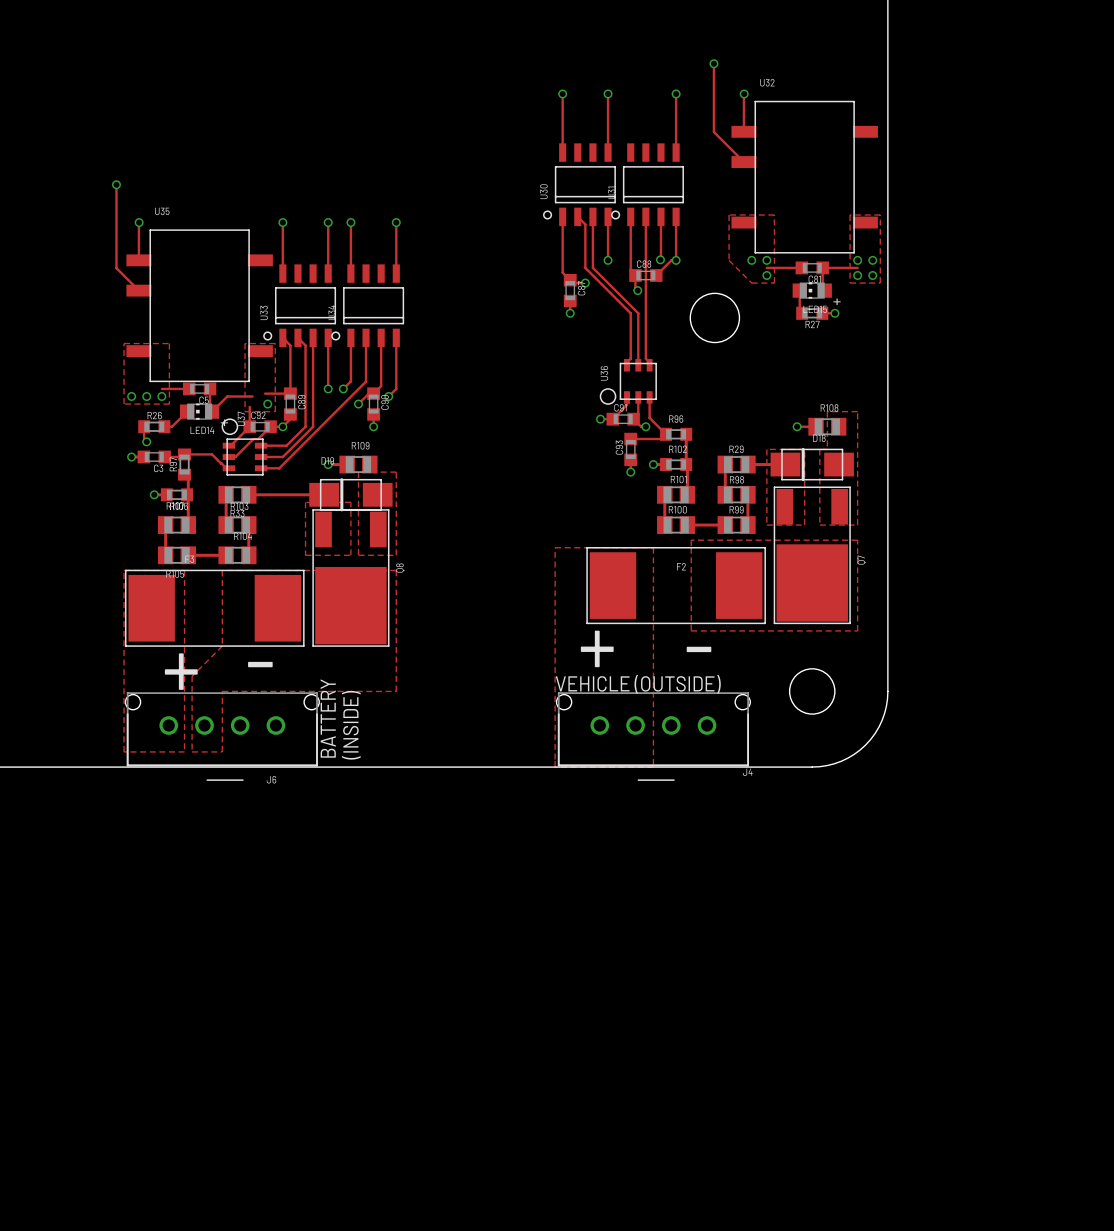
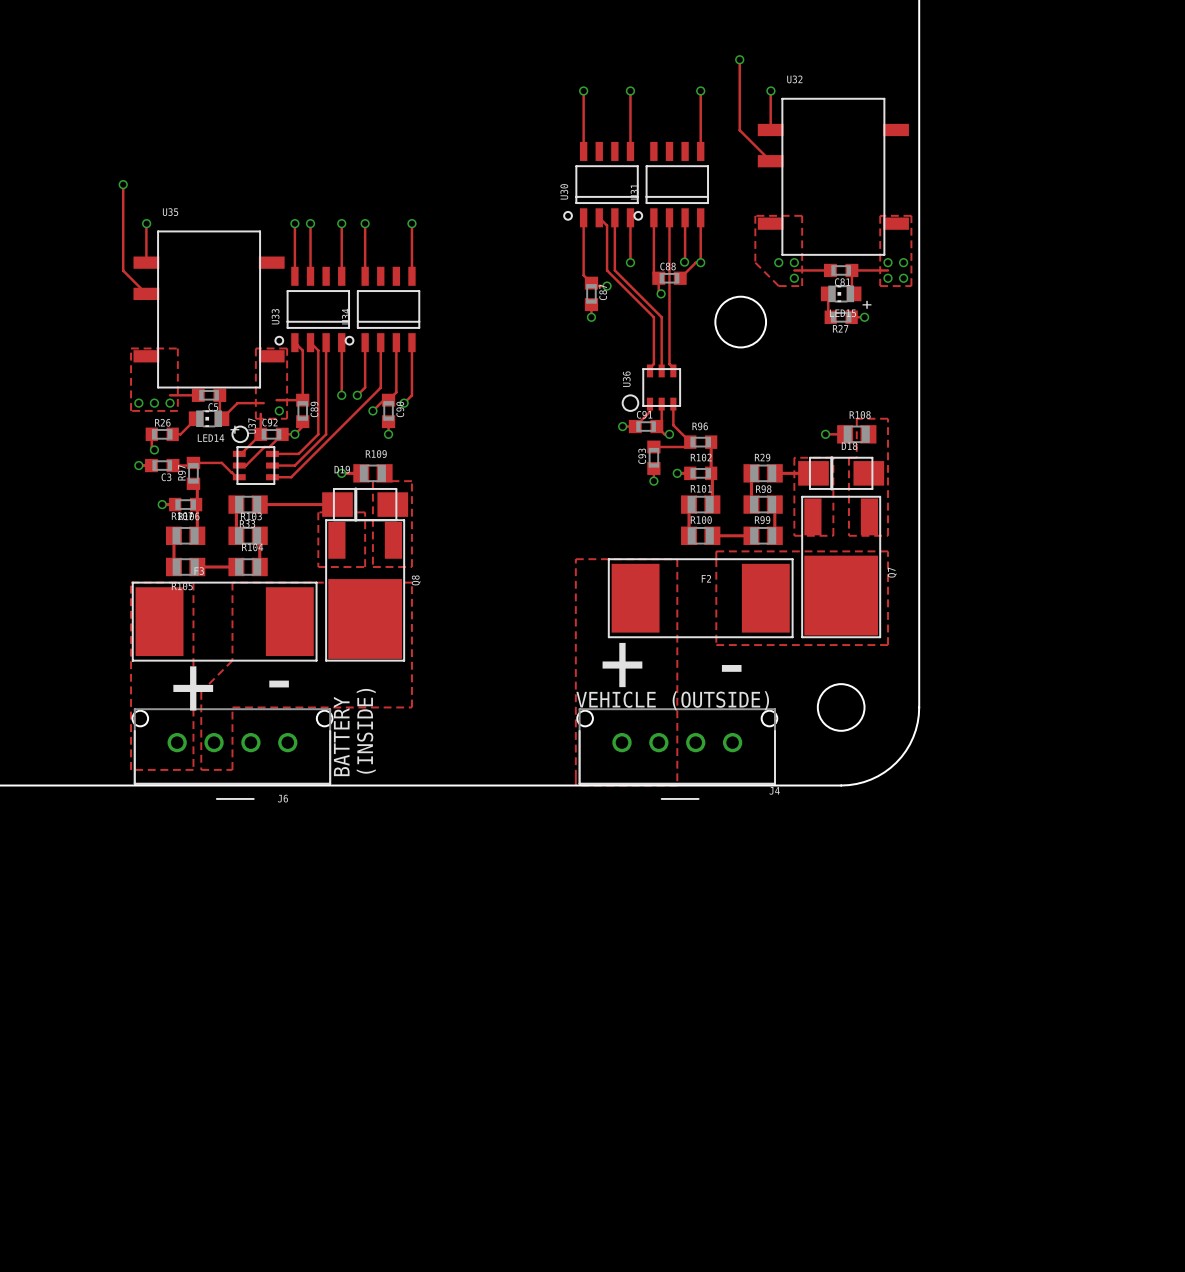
track: none -> (310, 223) (310, 276)
via: none -> (310, 223)

